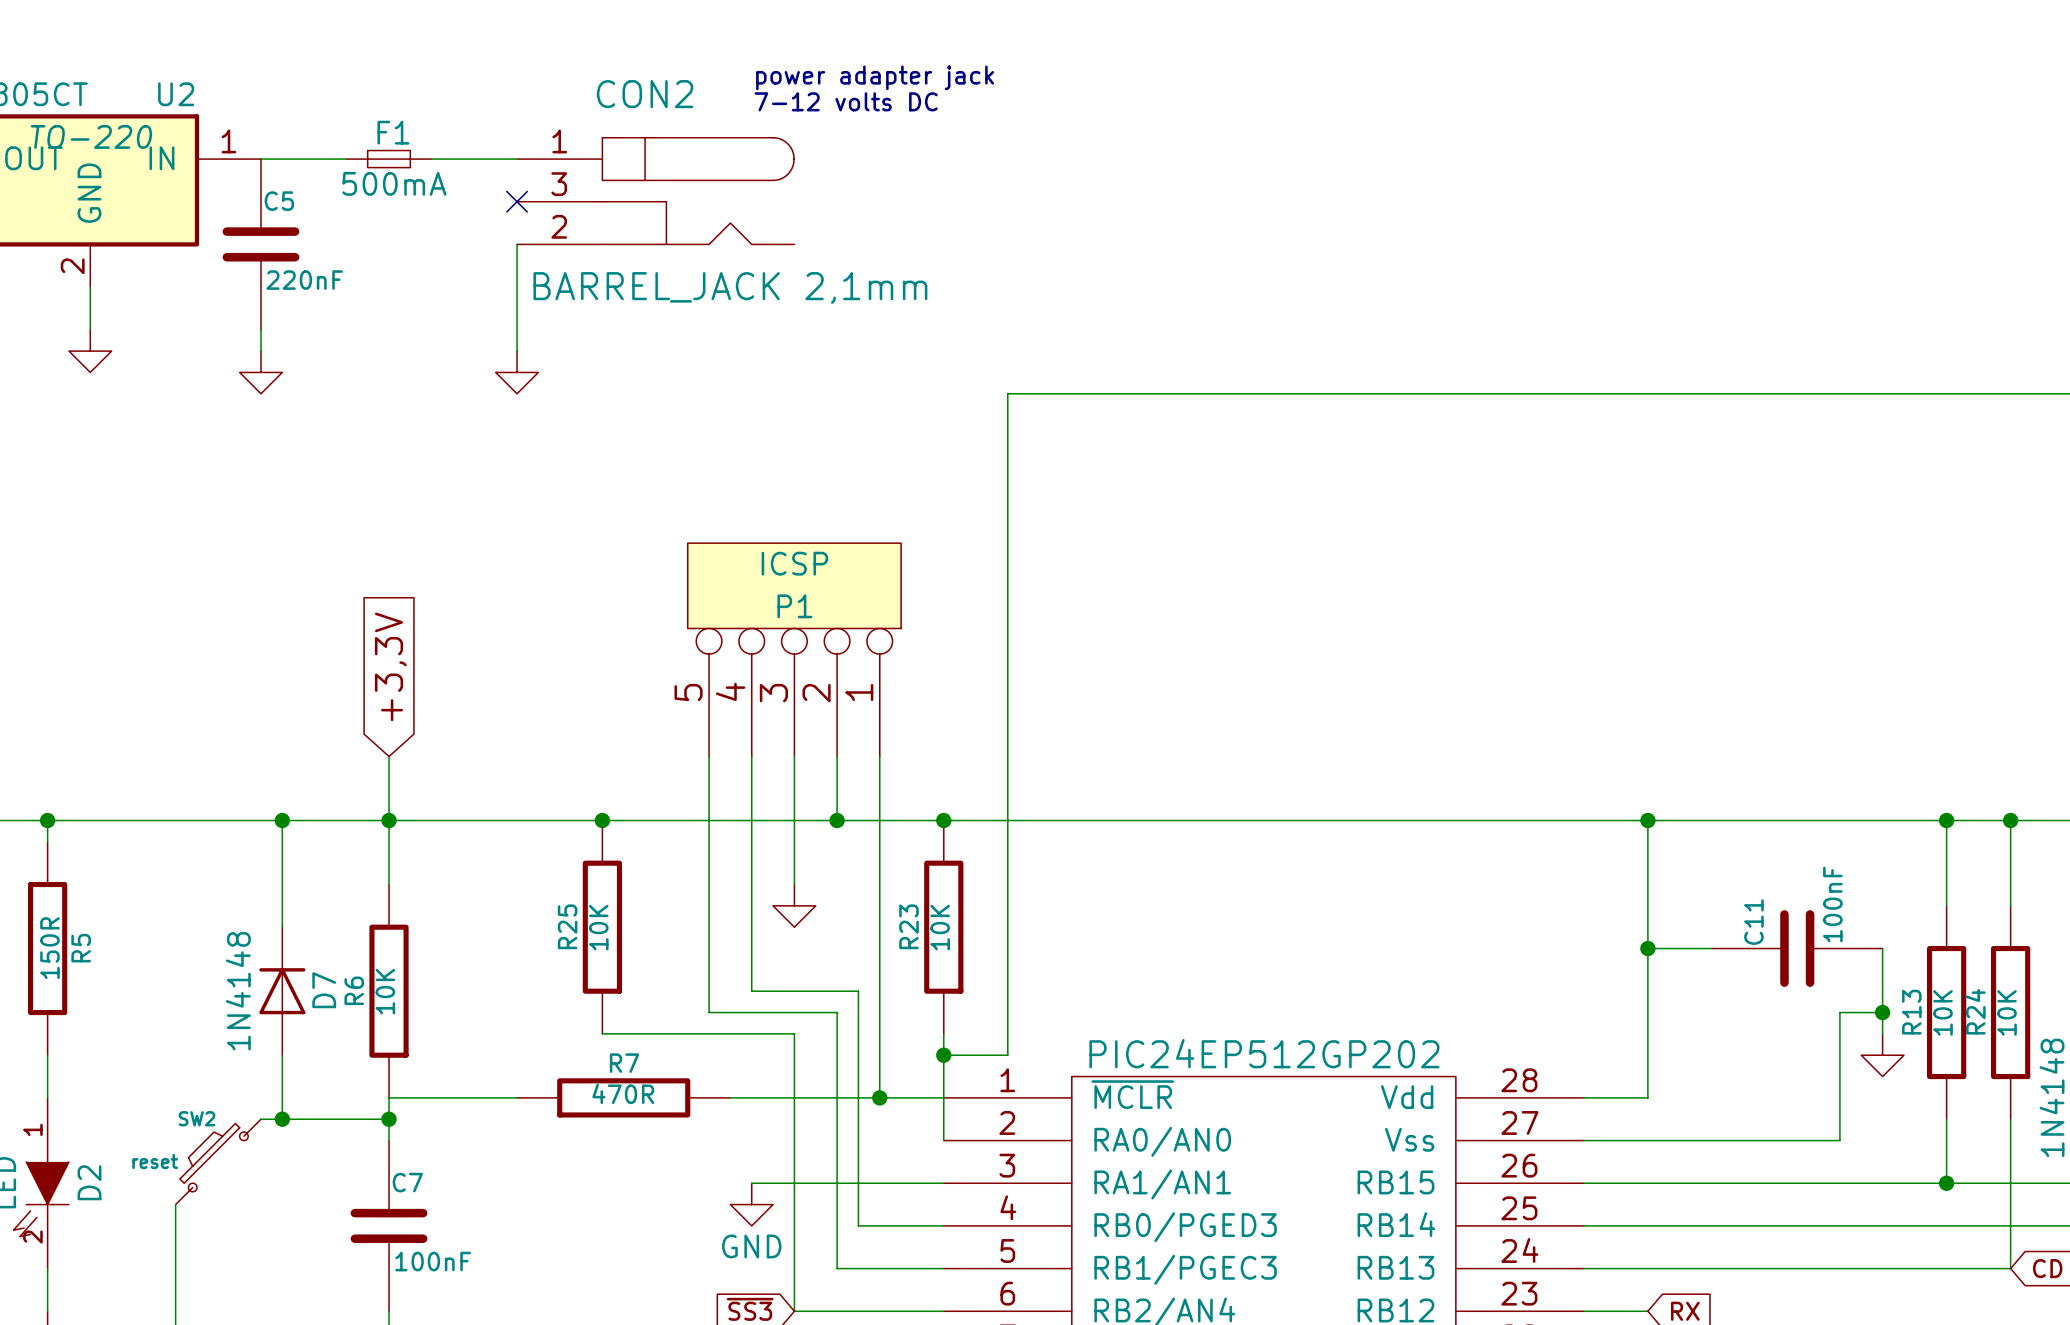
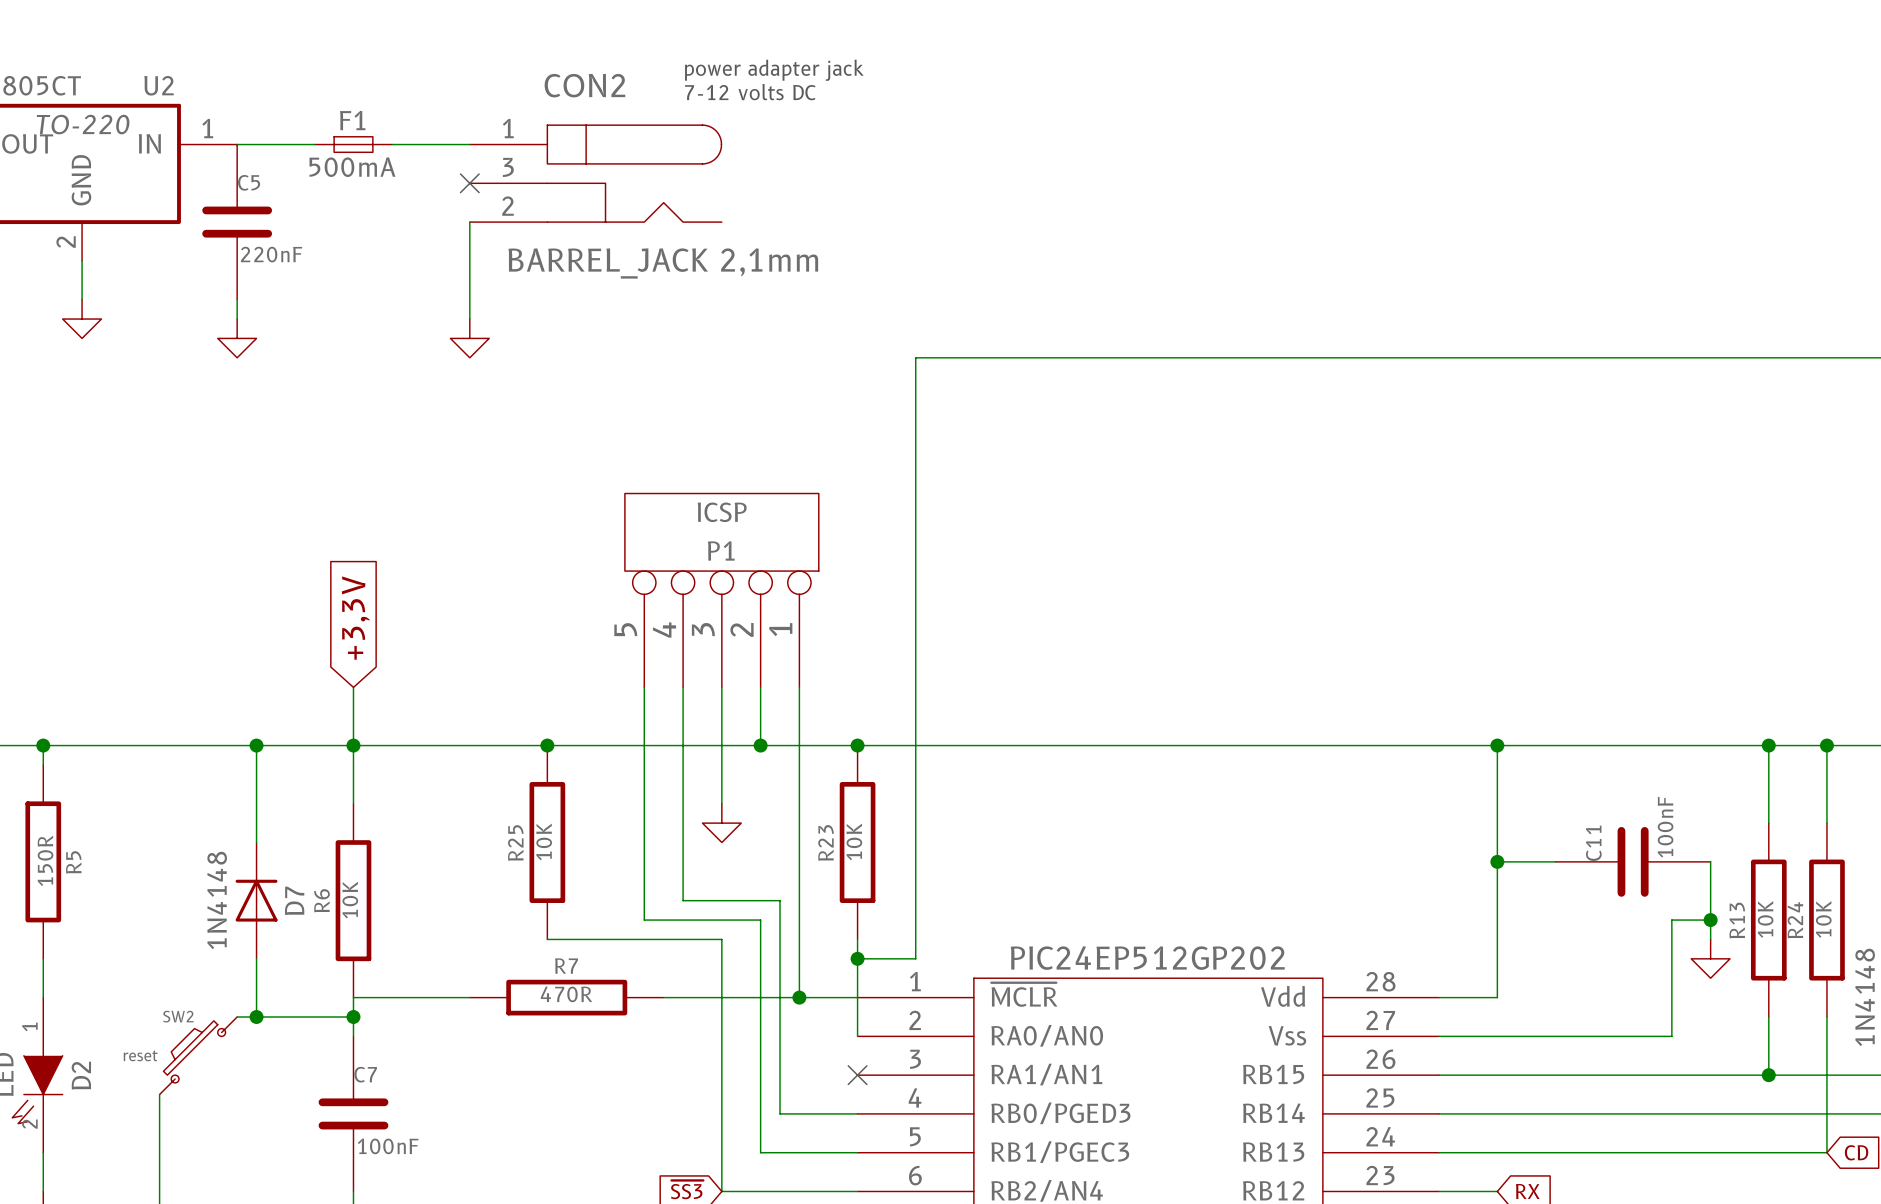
wire: (751, 1183) (943, 1183) -> none
no-connect mark: none -> (857, 1075)
power symbol: GND (751, 1204) -> none

